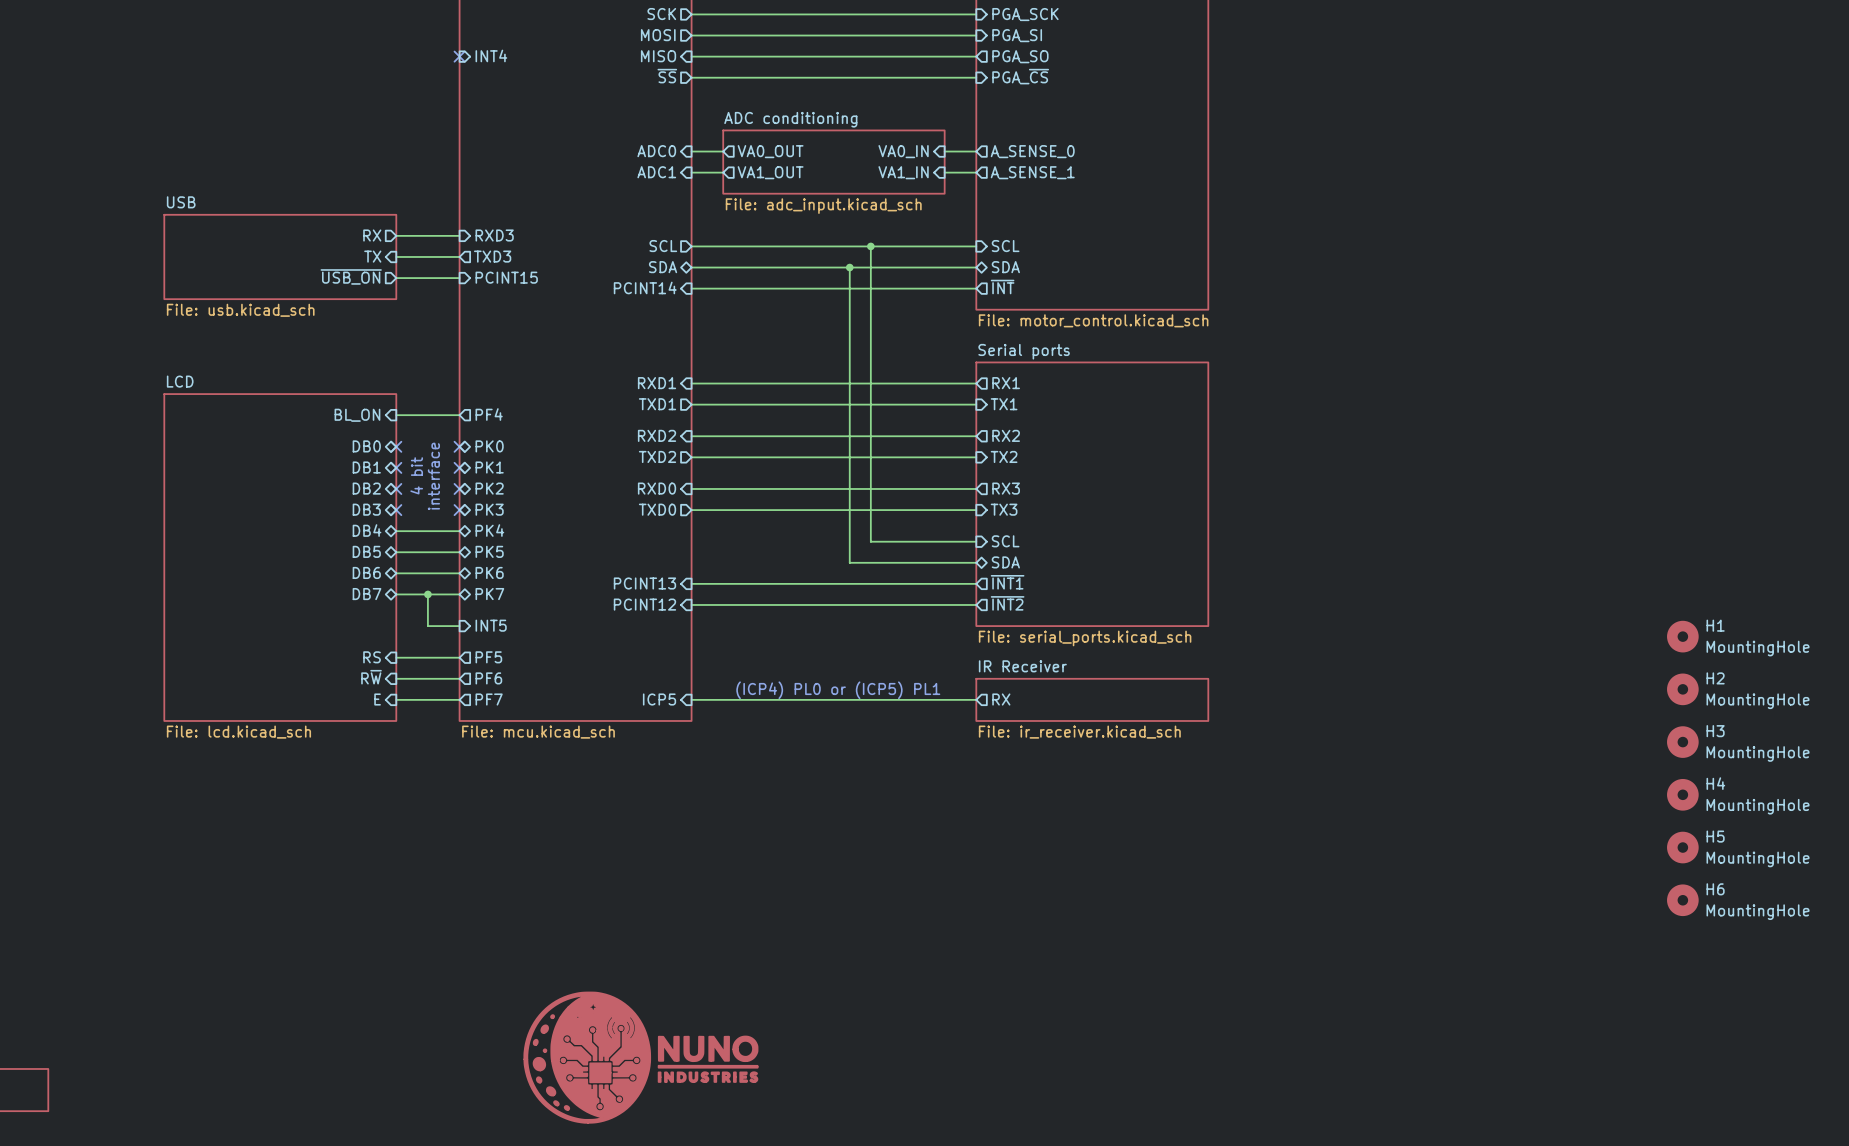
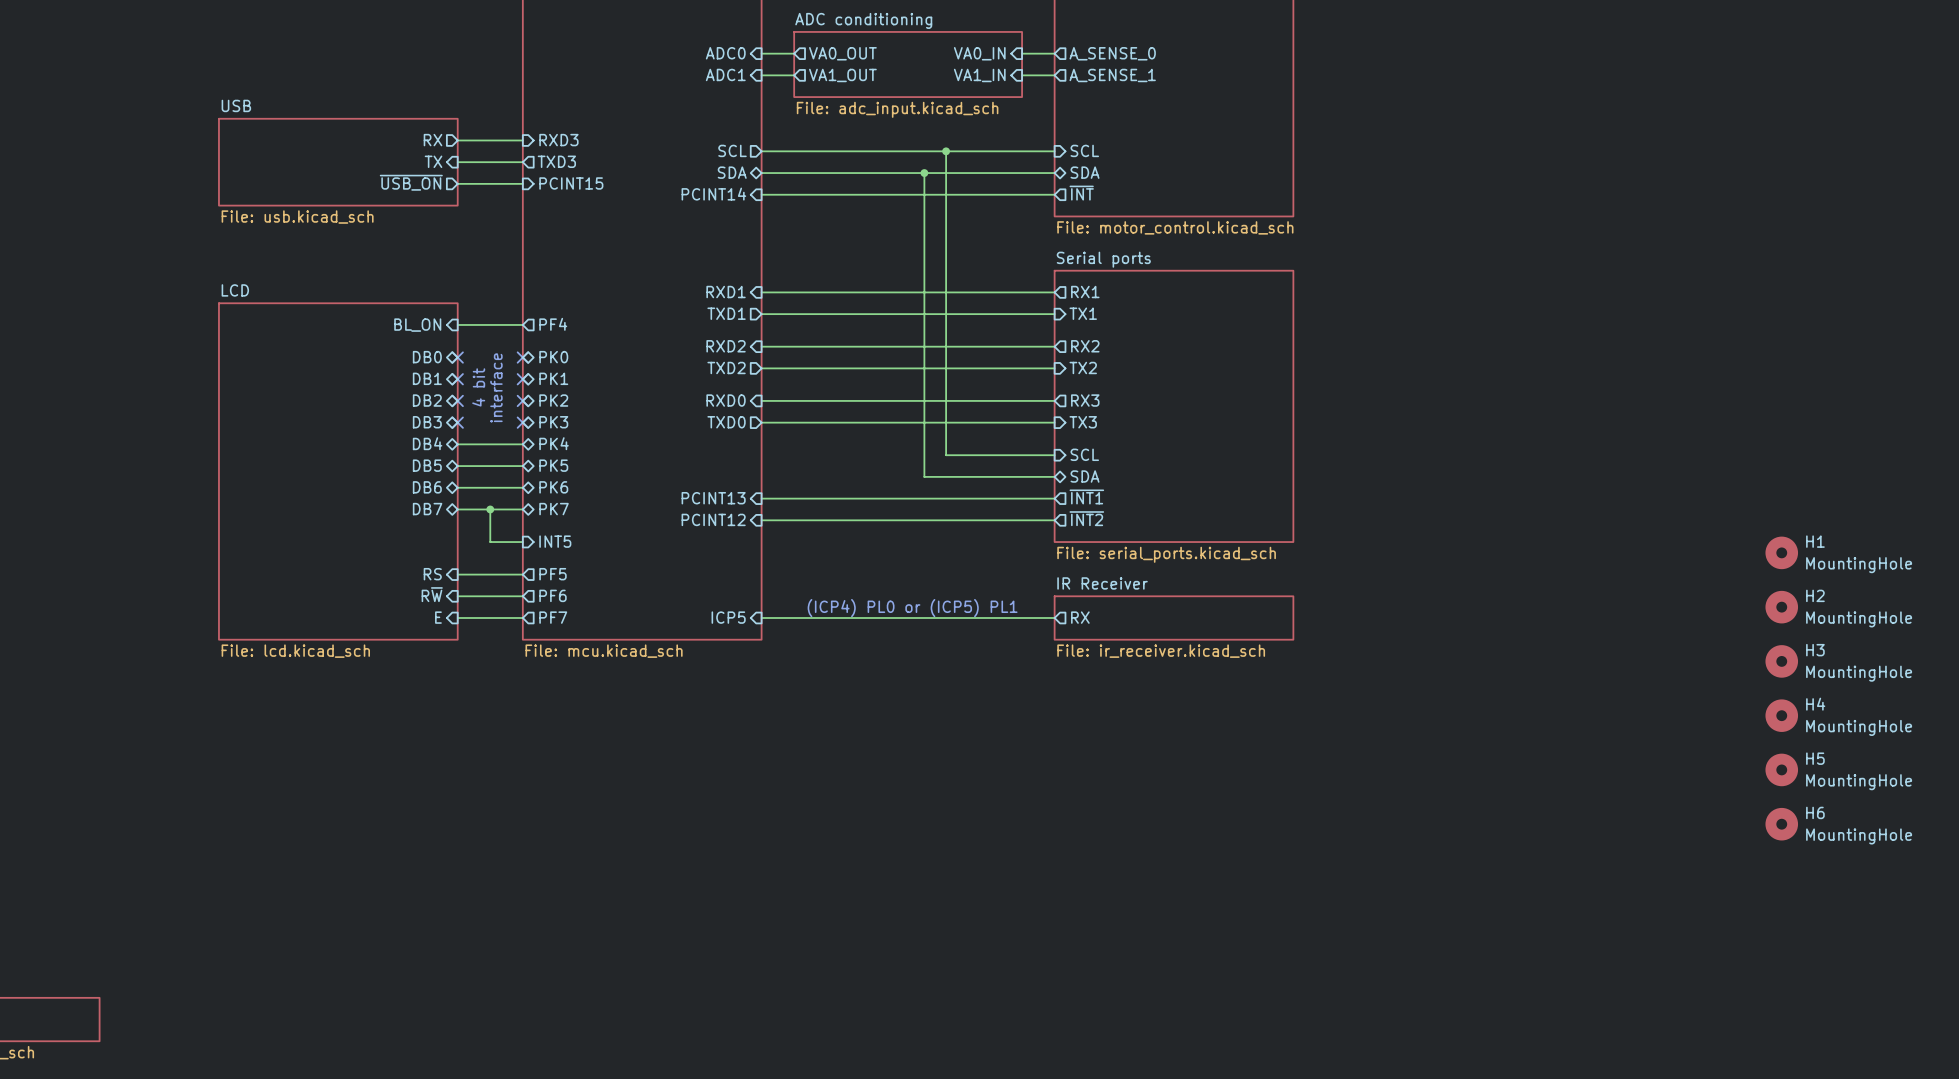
power symbol: (640, 1057) -> none

